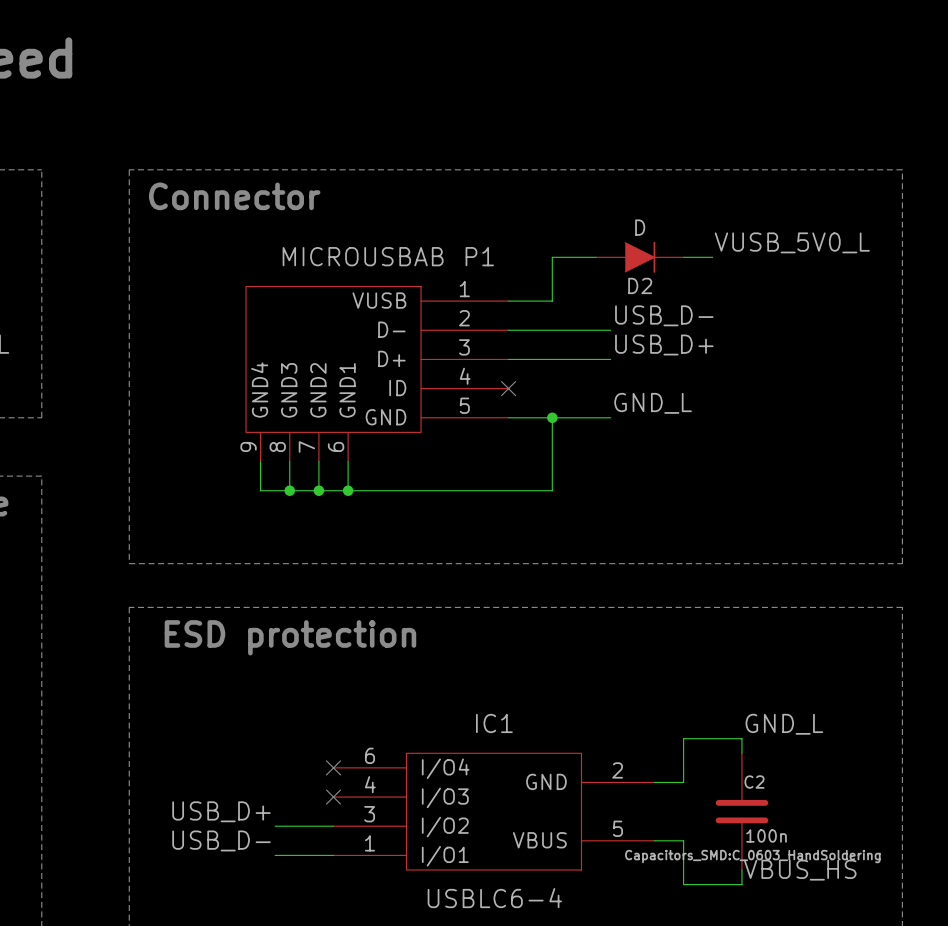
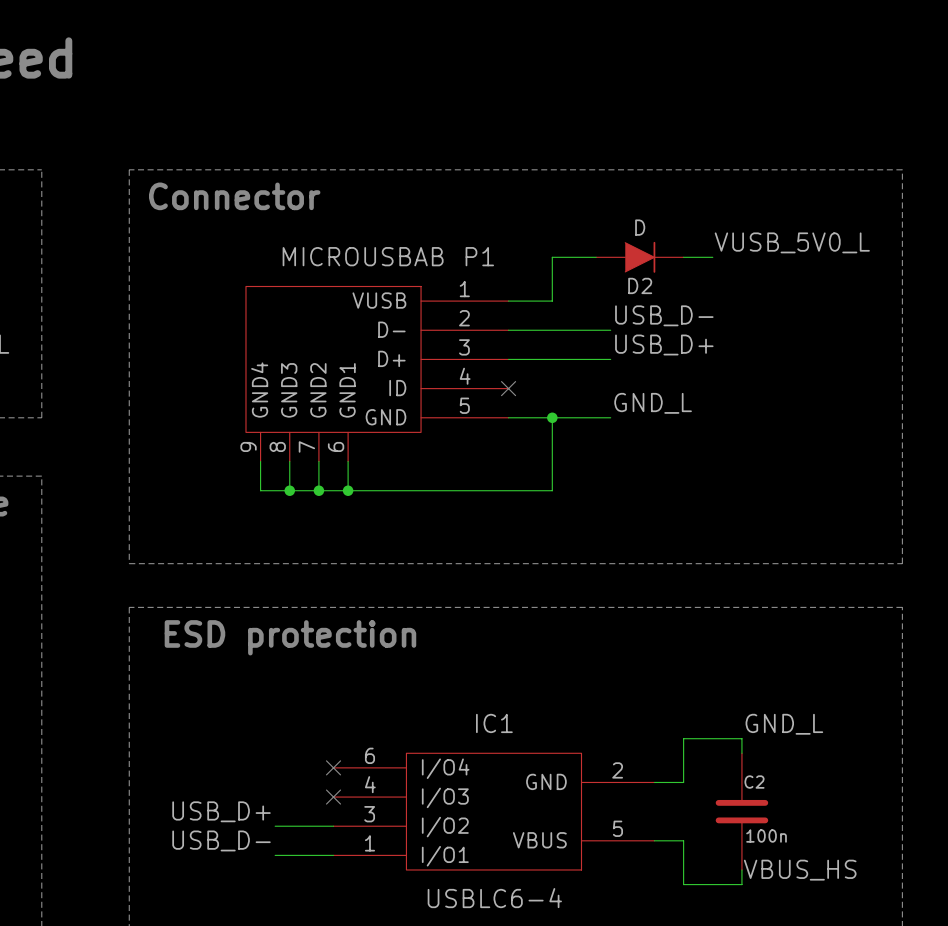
C2 text: Capacitors_SMD:C_0603_HandSoldering (752, 856) -> none

